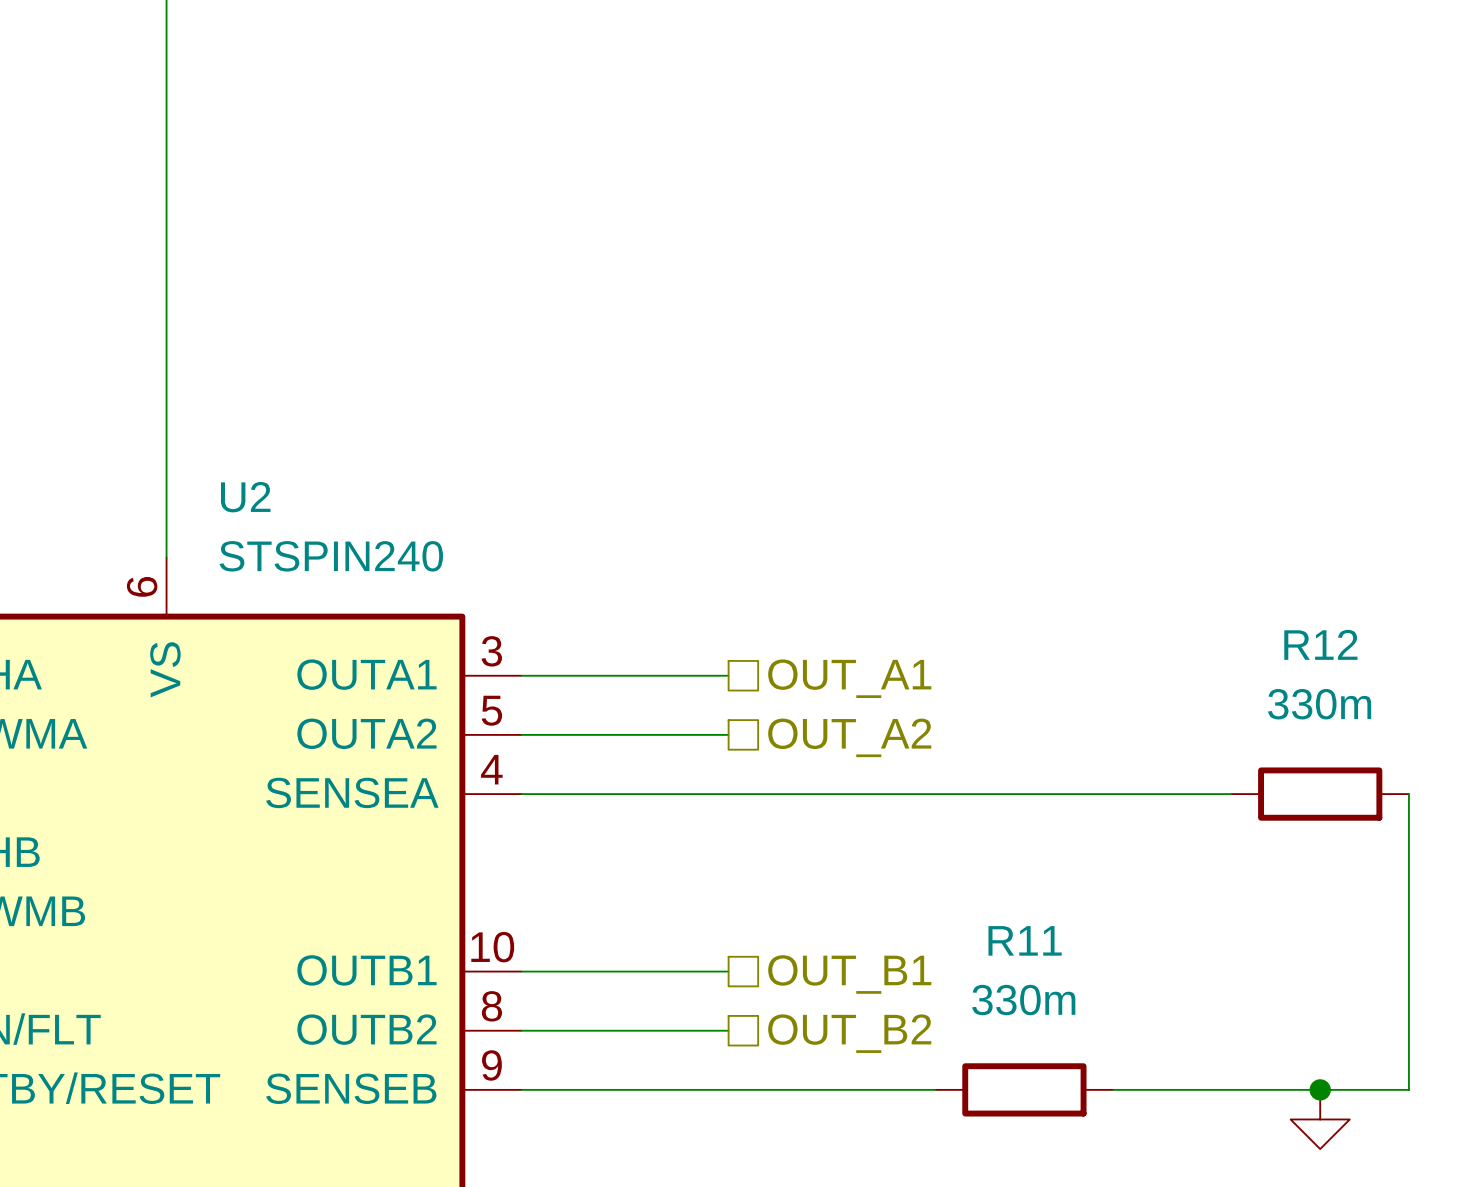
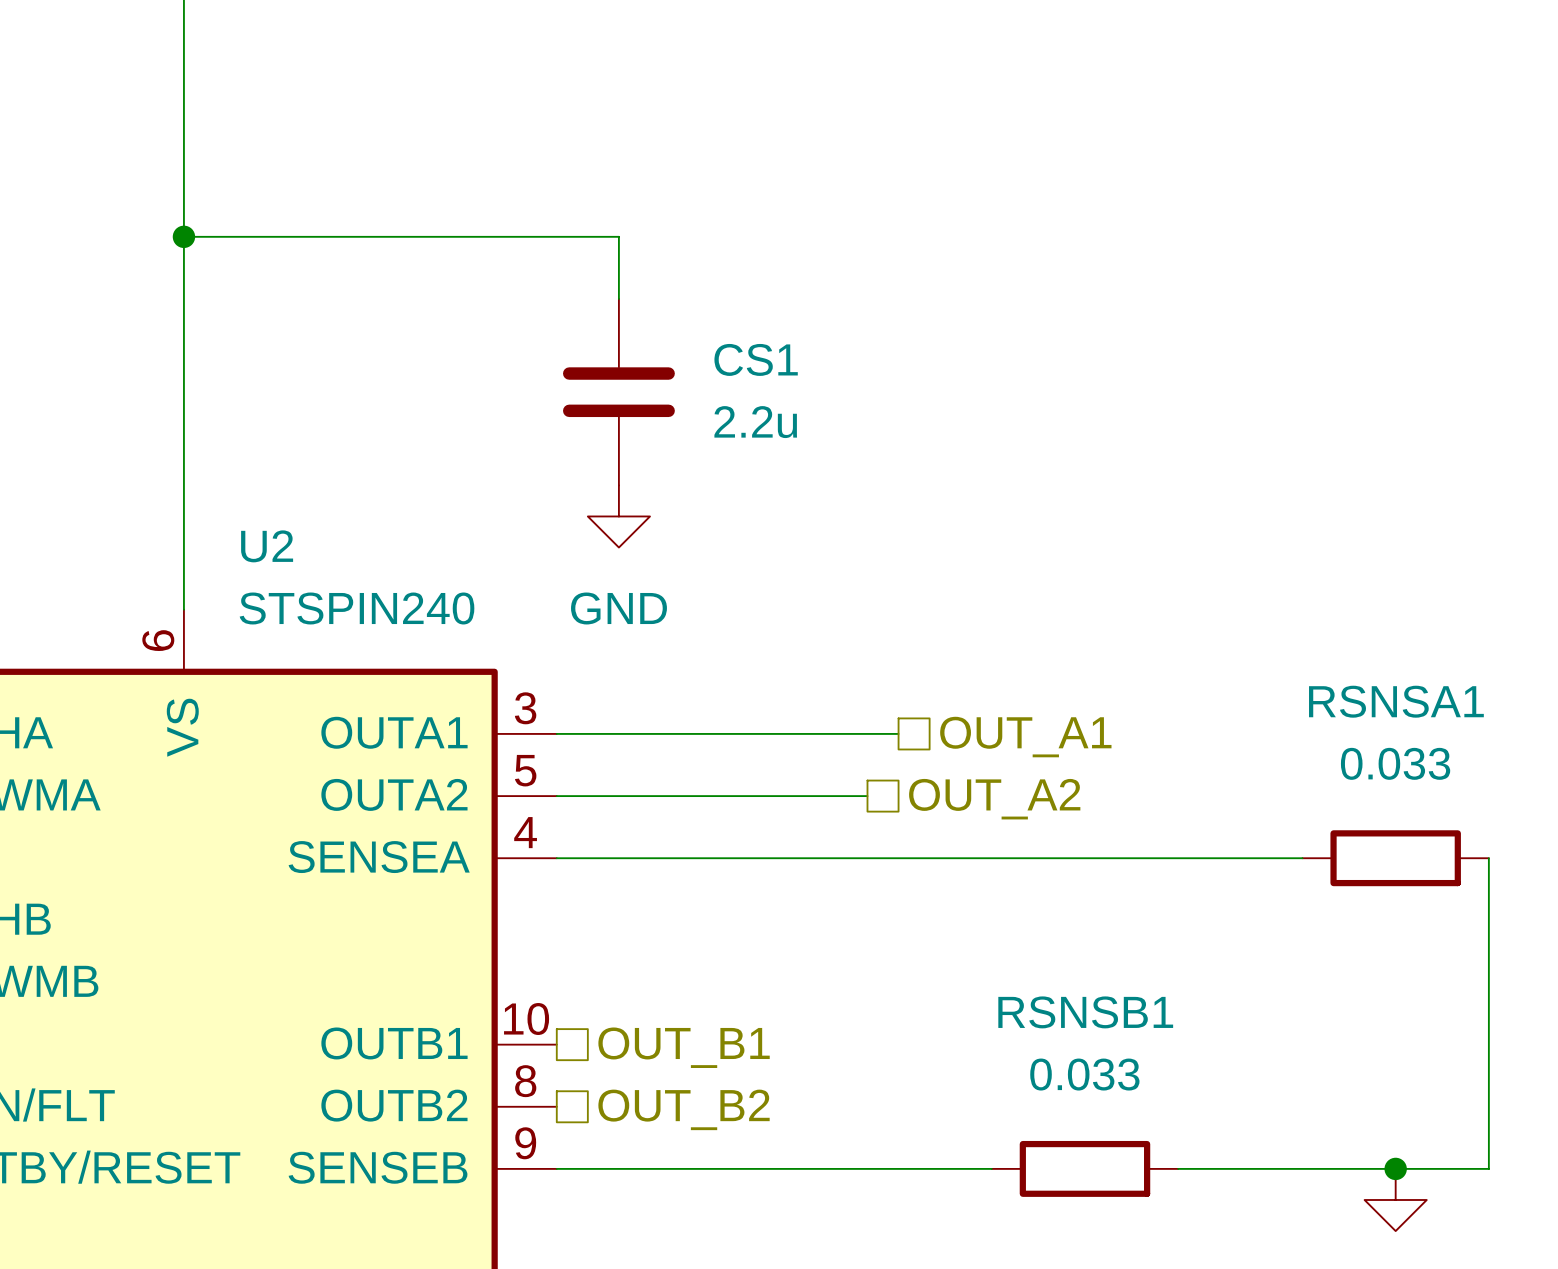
wire: none -> (183, 236) (618, 236) (618, 298)
junction: none -> (183, 236)
CS1: none -> 2.2u (618, 392)
power symbol: none -> GND (618, 516)
R12 name: R12 (1320, 644) -> RSNSA1 (1396, 701)
wire: none -> (774, 733) (898, 733)
hierarchical label position: OUT_A1 (849, 678) -> OUT_A1 (1025, 737)
R12 value: 330m (1319, 704) -> 0.033 (1395, 763)
wire: none -> (774, 796) (867, 796)
hierarchical label position: OUT_A2 (849, 737) -> OUT_A2 (994, 799)
R11 name: R11 (1025, 940) -> RSNSB1 (1085, 1012)
wire: (521, 971) (728, 971) -> none
hierarchical label position: OUT_B1 (849, 974) -> OUT_B1 (684, 1047)
R11 value: 330m (1023, 1000) -> 0.033 (1084, 1074)
wire: (521, 1030) (728, 1030) -> none
hierarchical label position: OUT_B2 (849, 1033) -> OUT_B2 (684, 1109)

